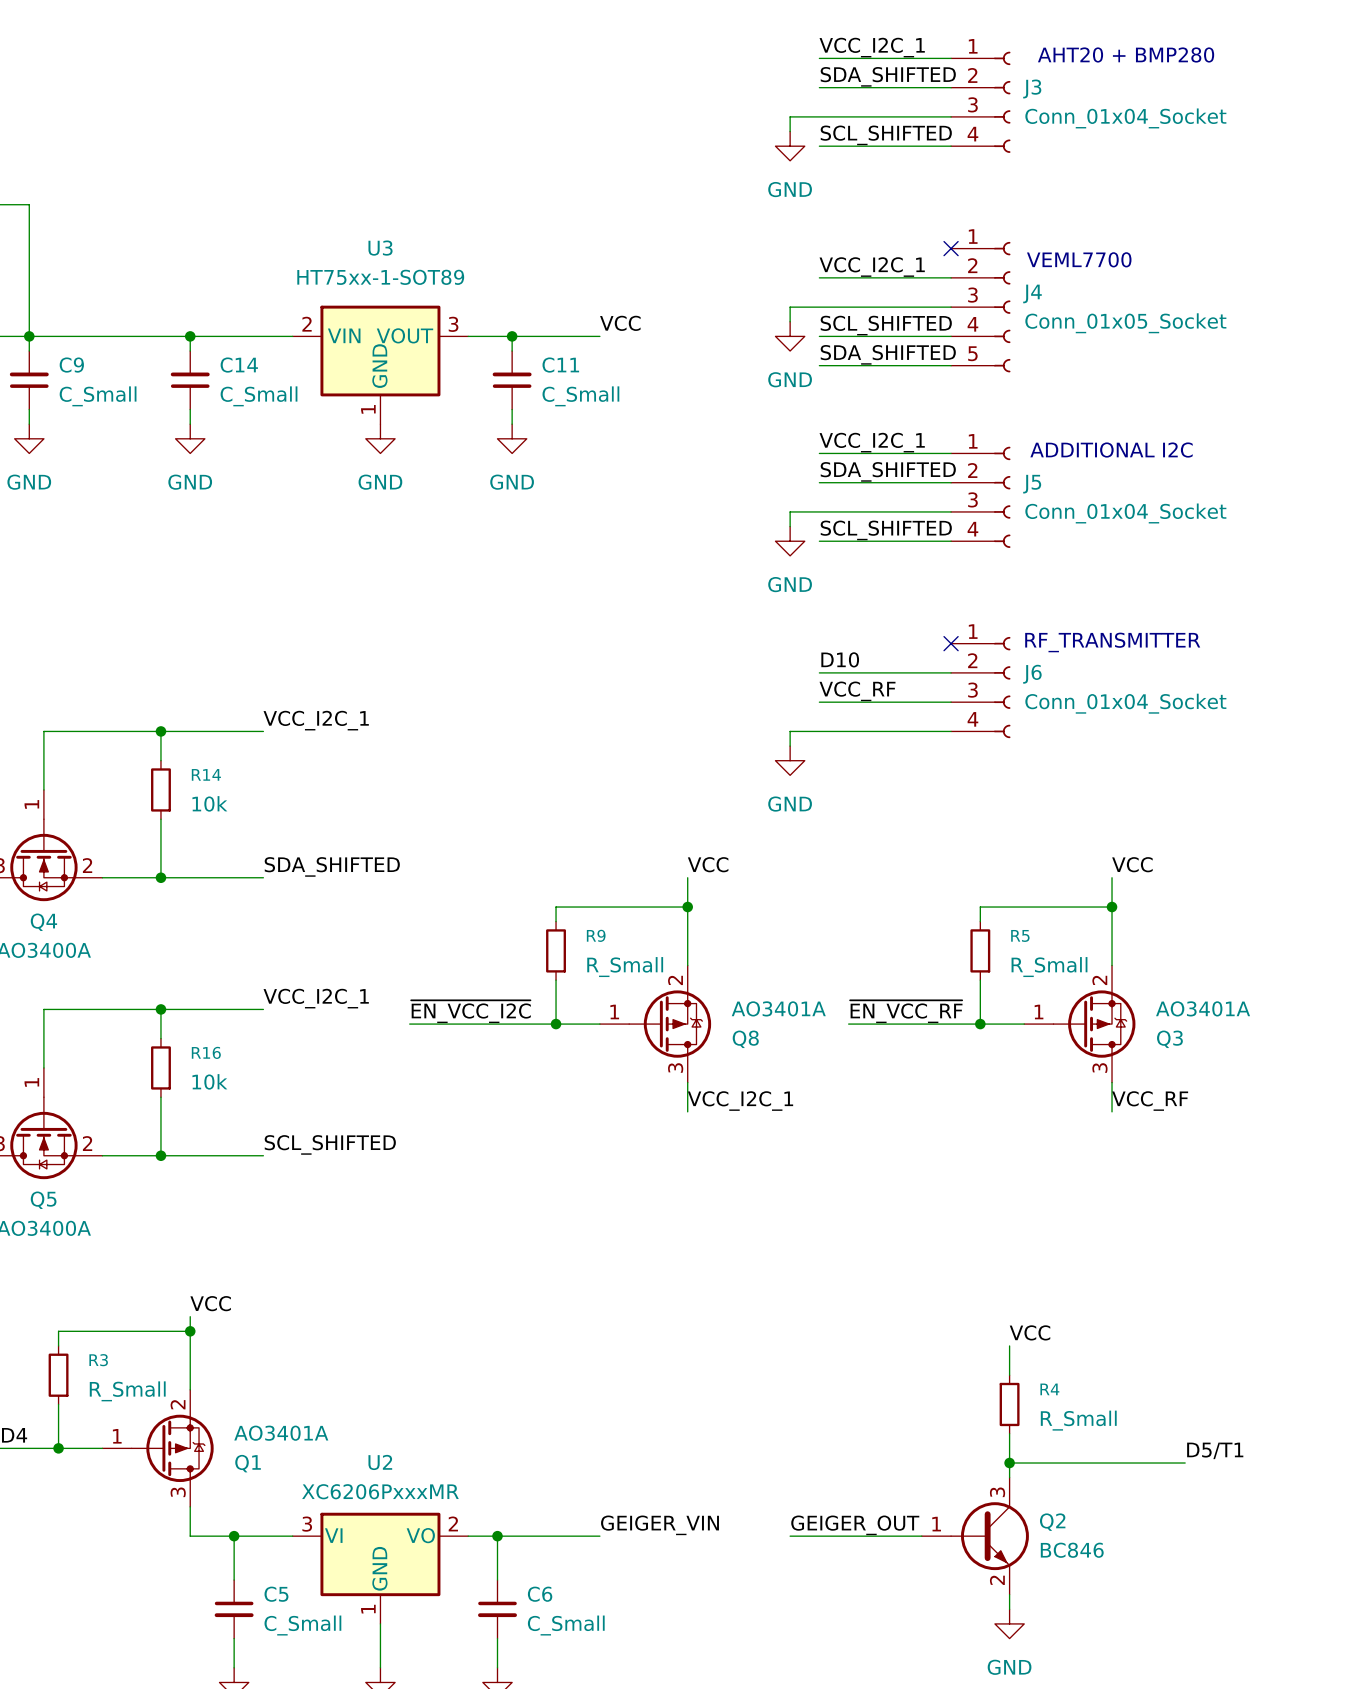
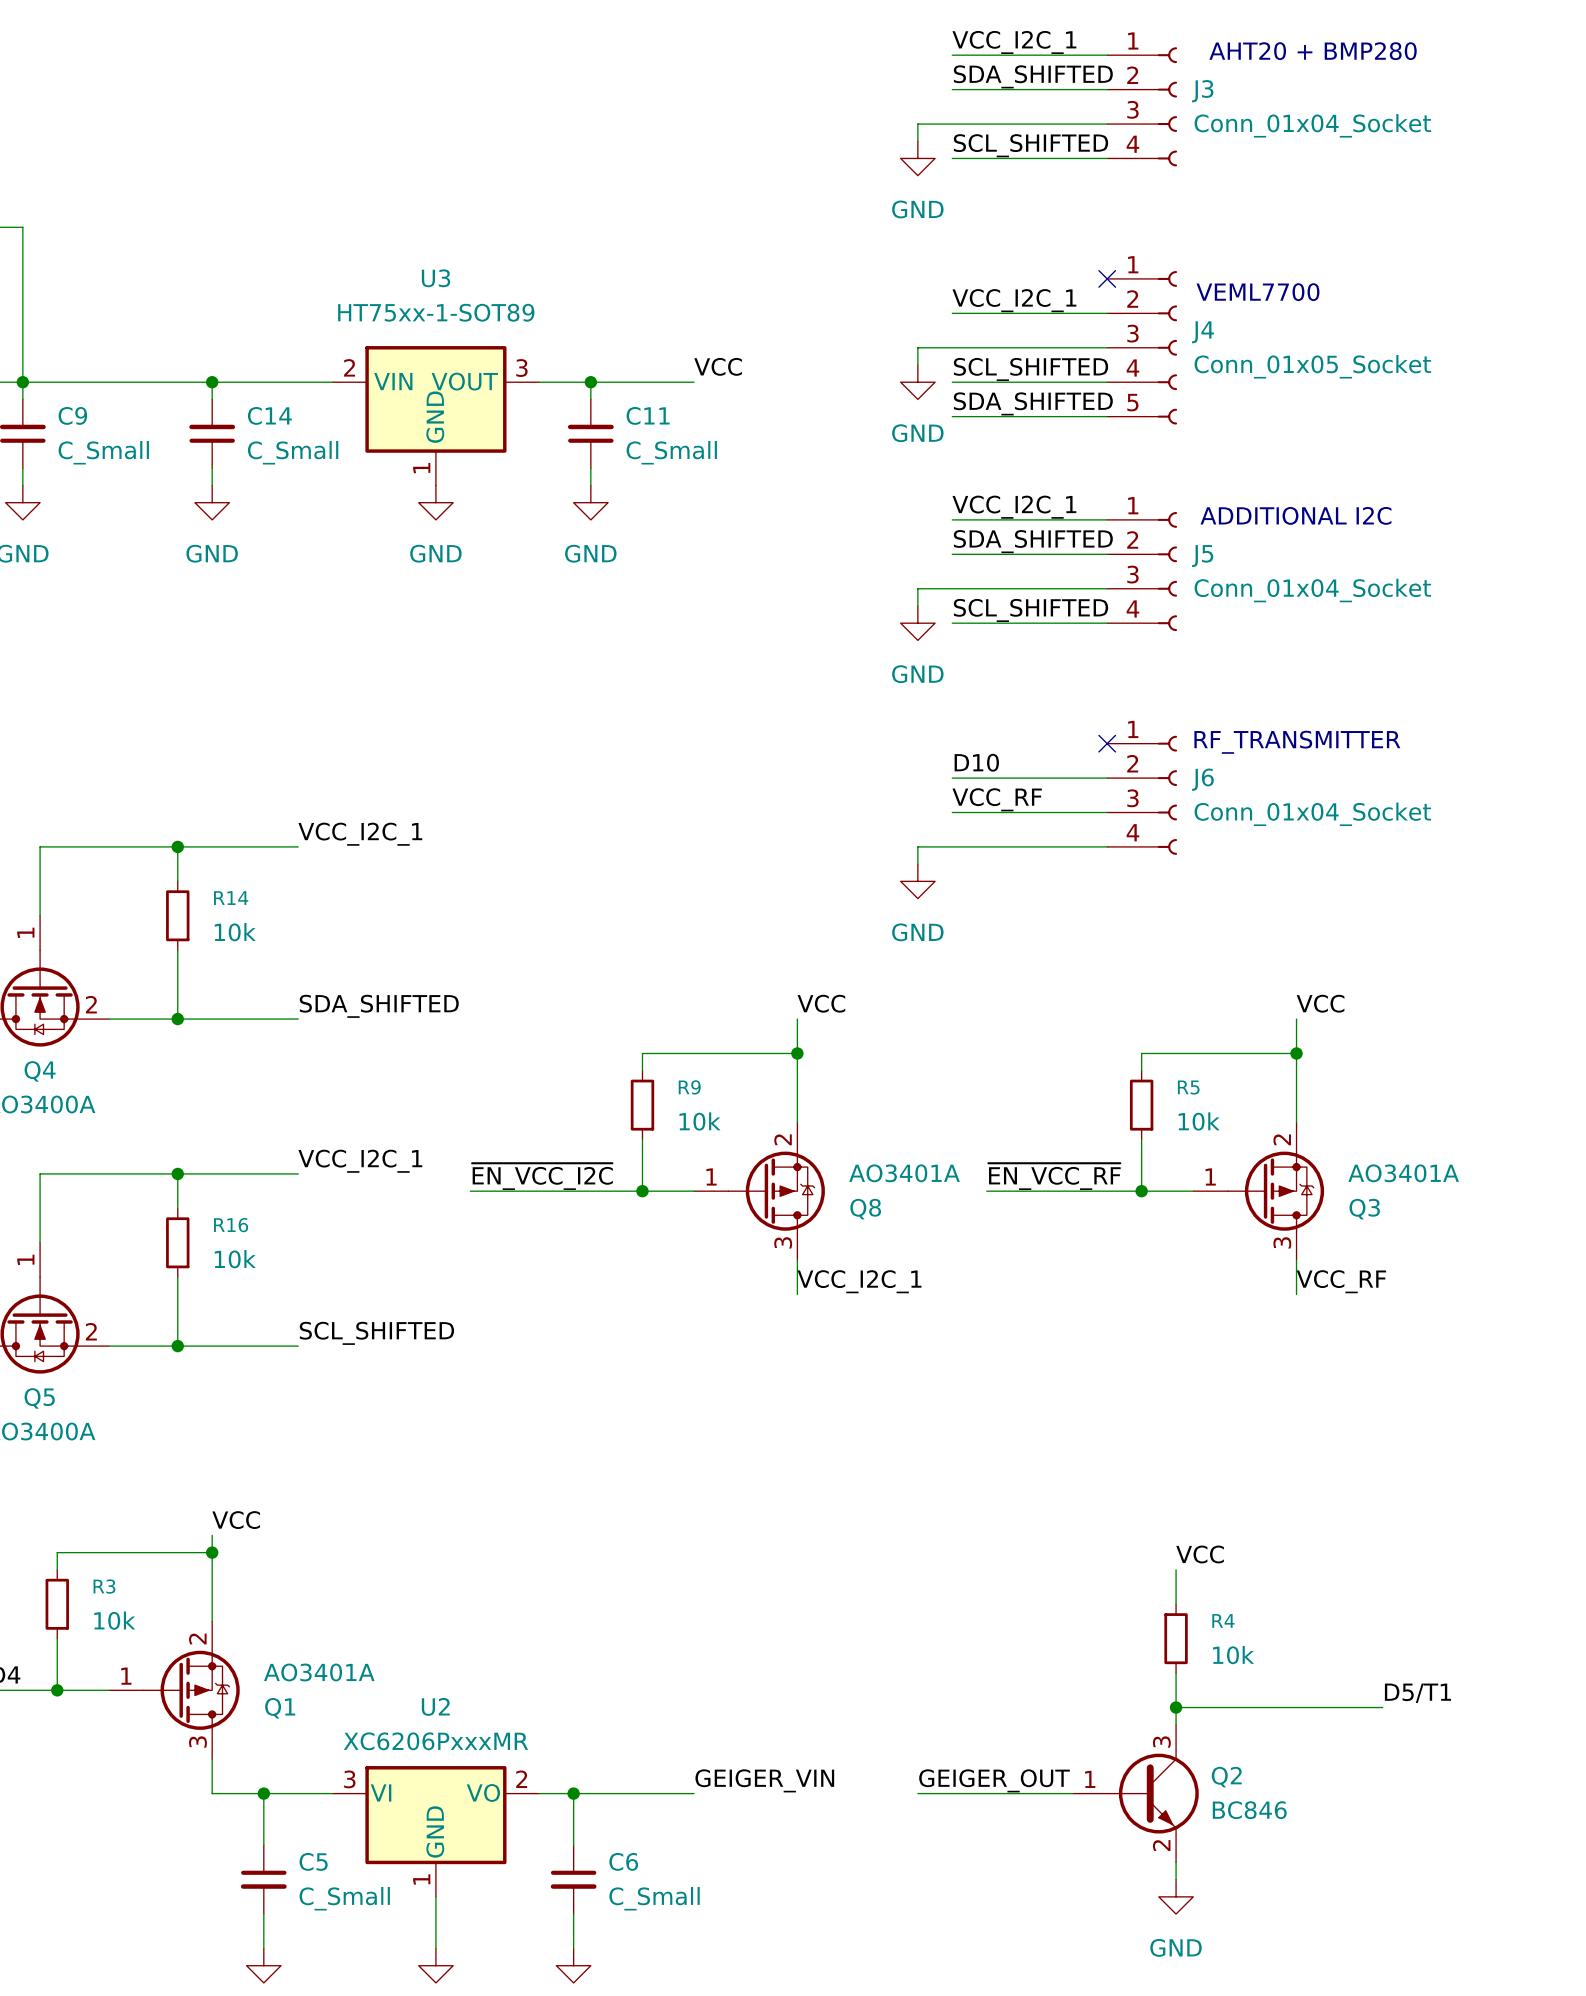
R9 value: R_Small (625, 967) -> 10k (700, 1121)
R5 value: R_Small (1049, 967) -> 10k (1199, 1121)
R3 value: R_Small (127, 1391) -> 10k (114, 1620)
R4 value: R_Small (1078, 1420) -> 10k (1233, 1655)

